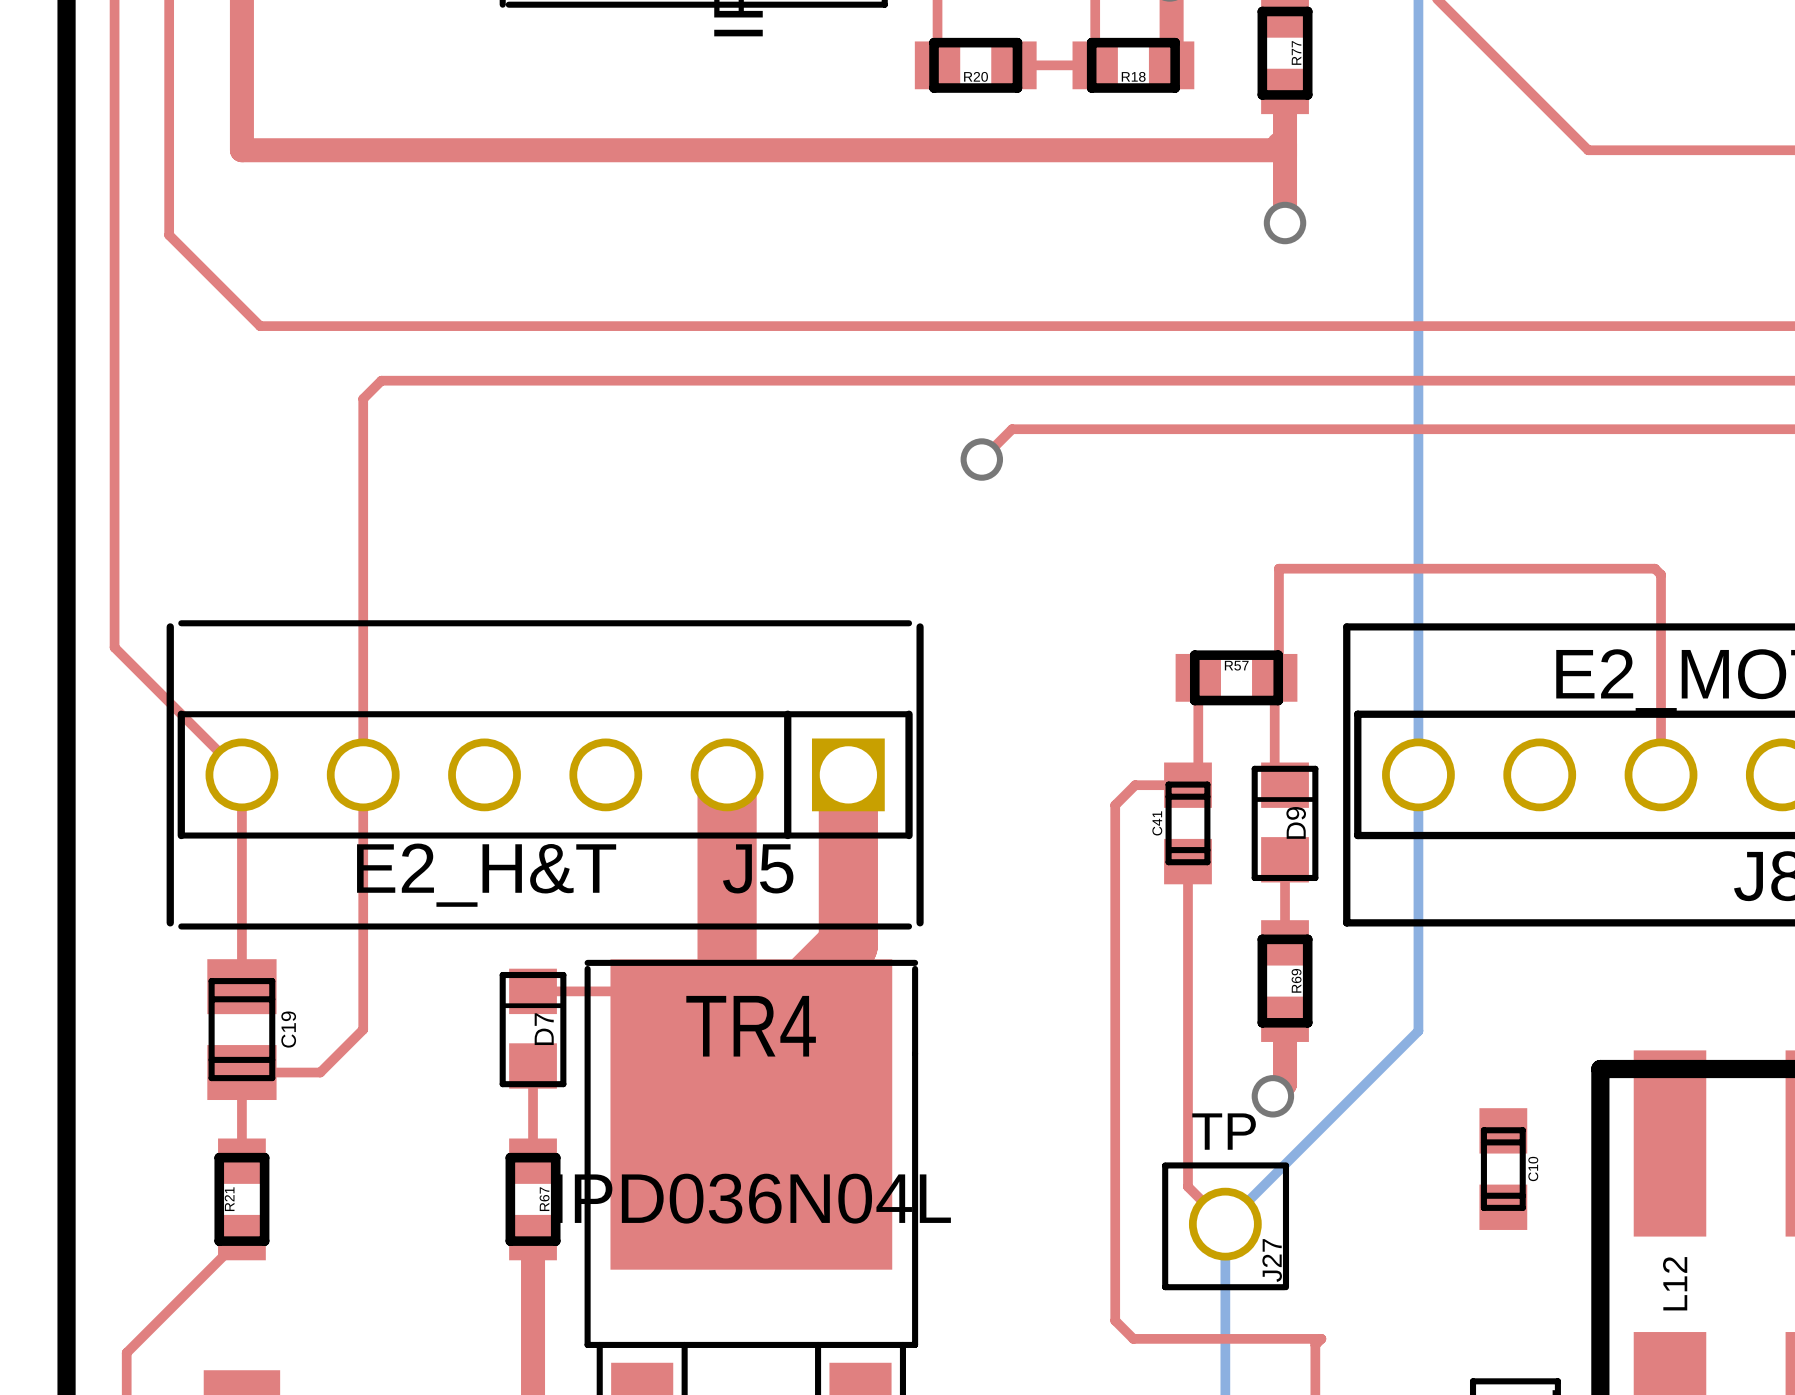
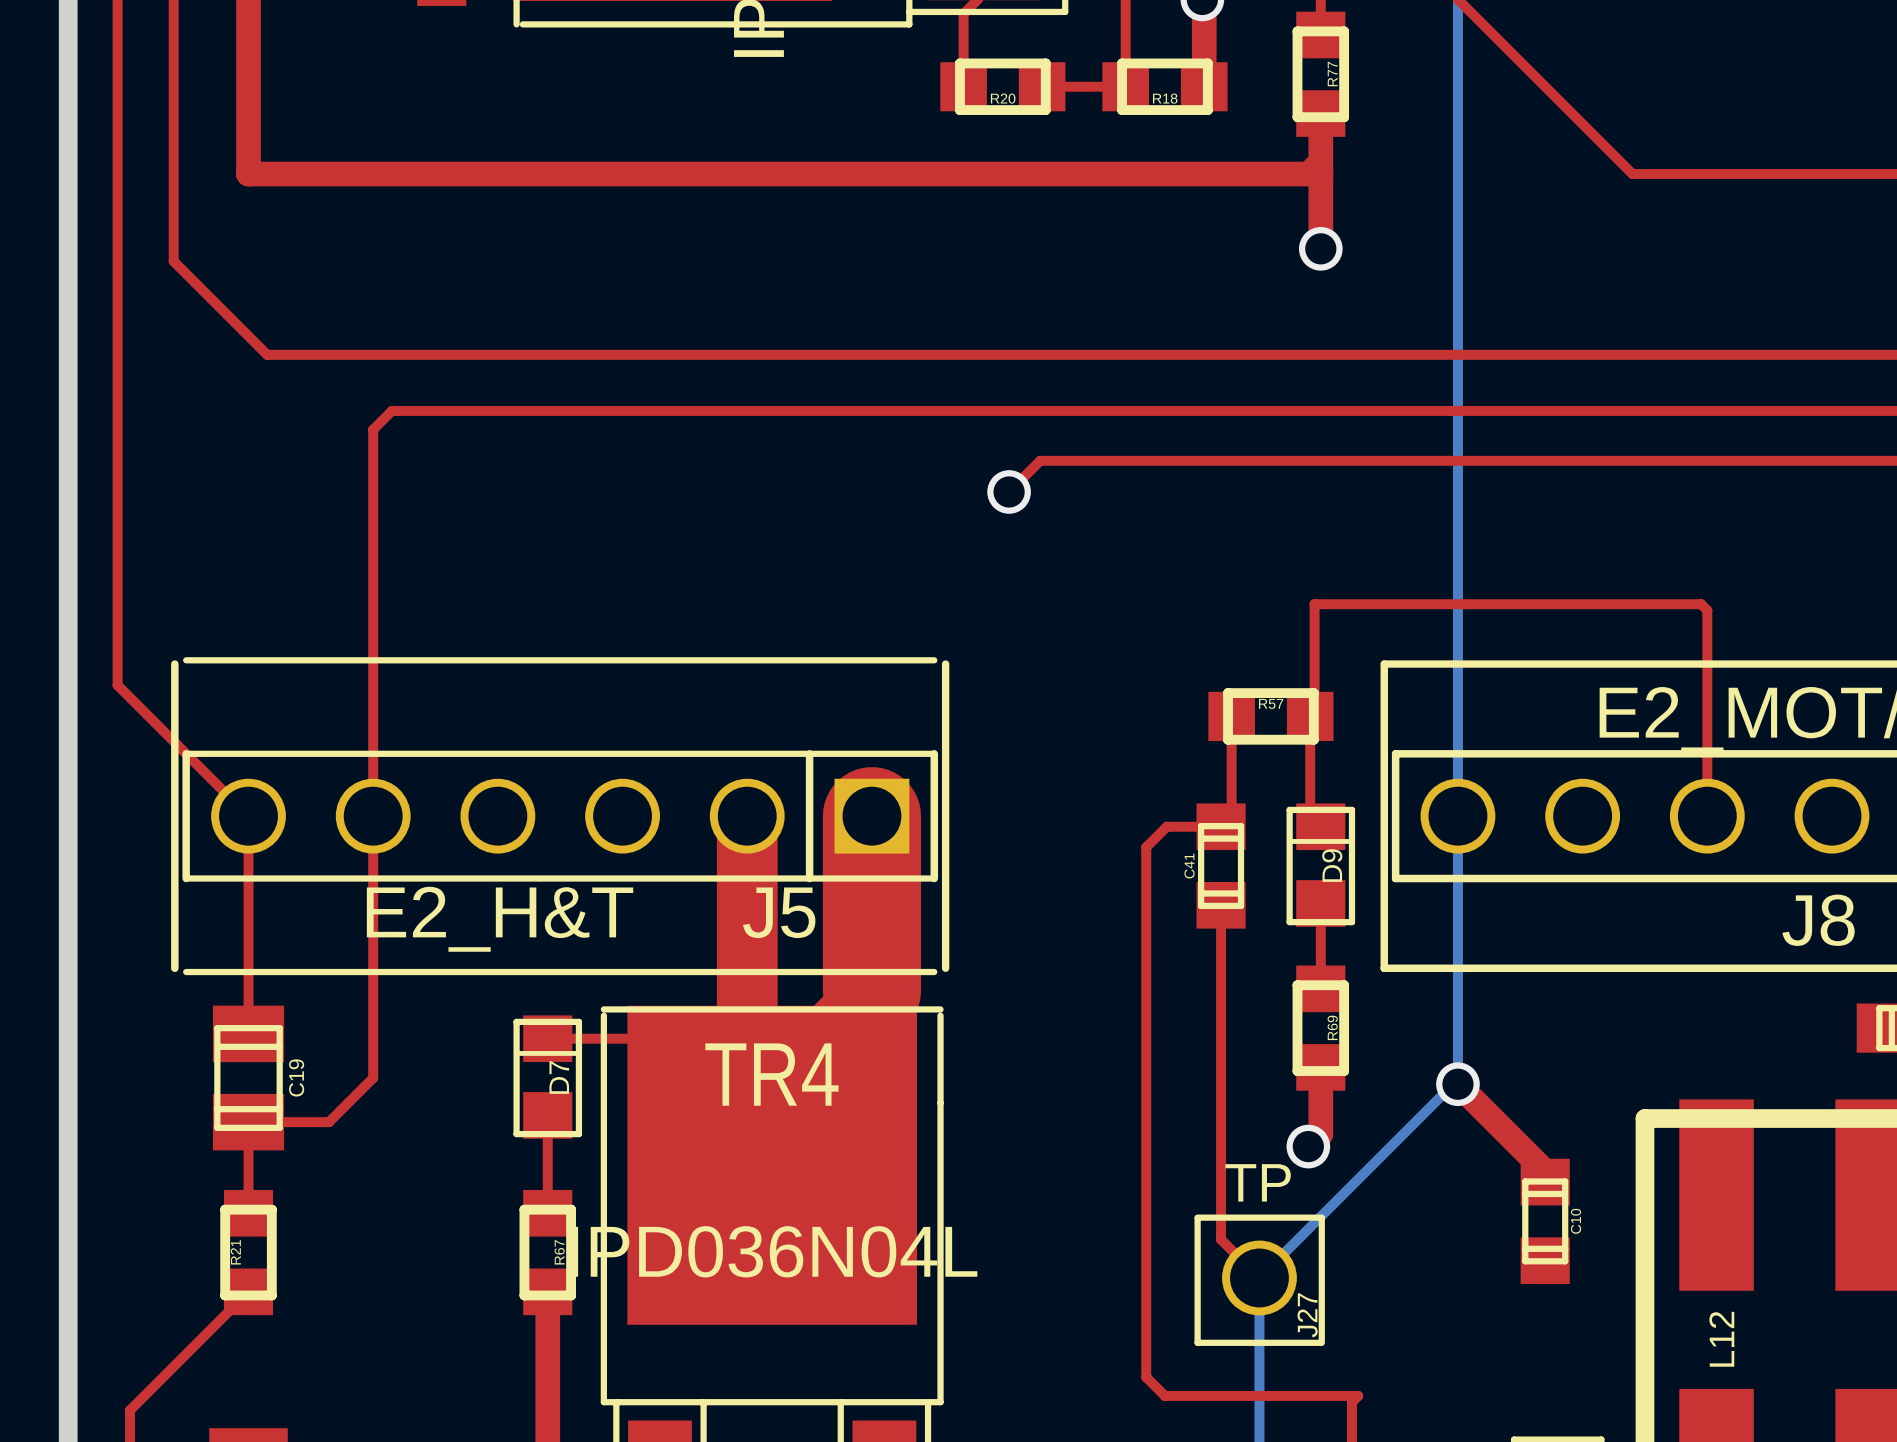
top track width: thin (848, 774) (848, 944) -> thick (871, 816) (871, 990)
top track: none -> (1457, 1084) (1545, 1171) (1545, 1182)
via: none -> (1457, 1084)

